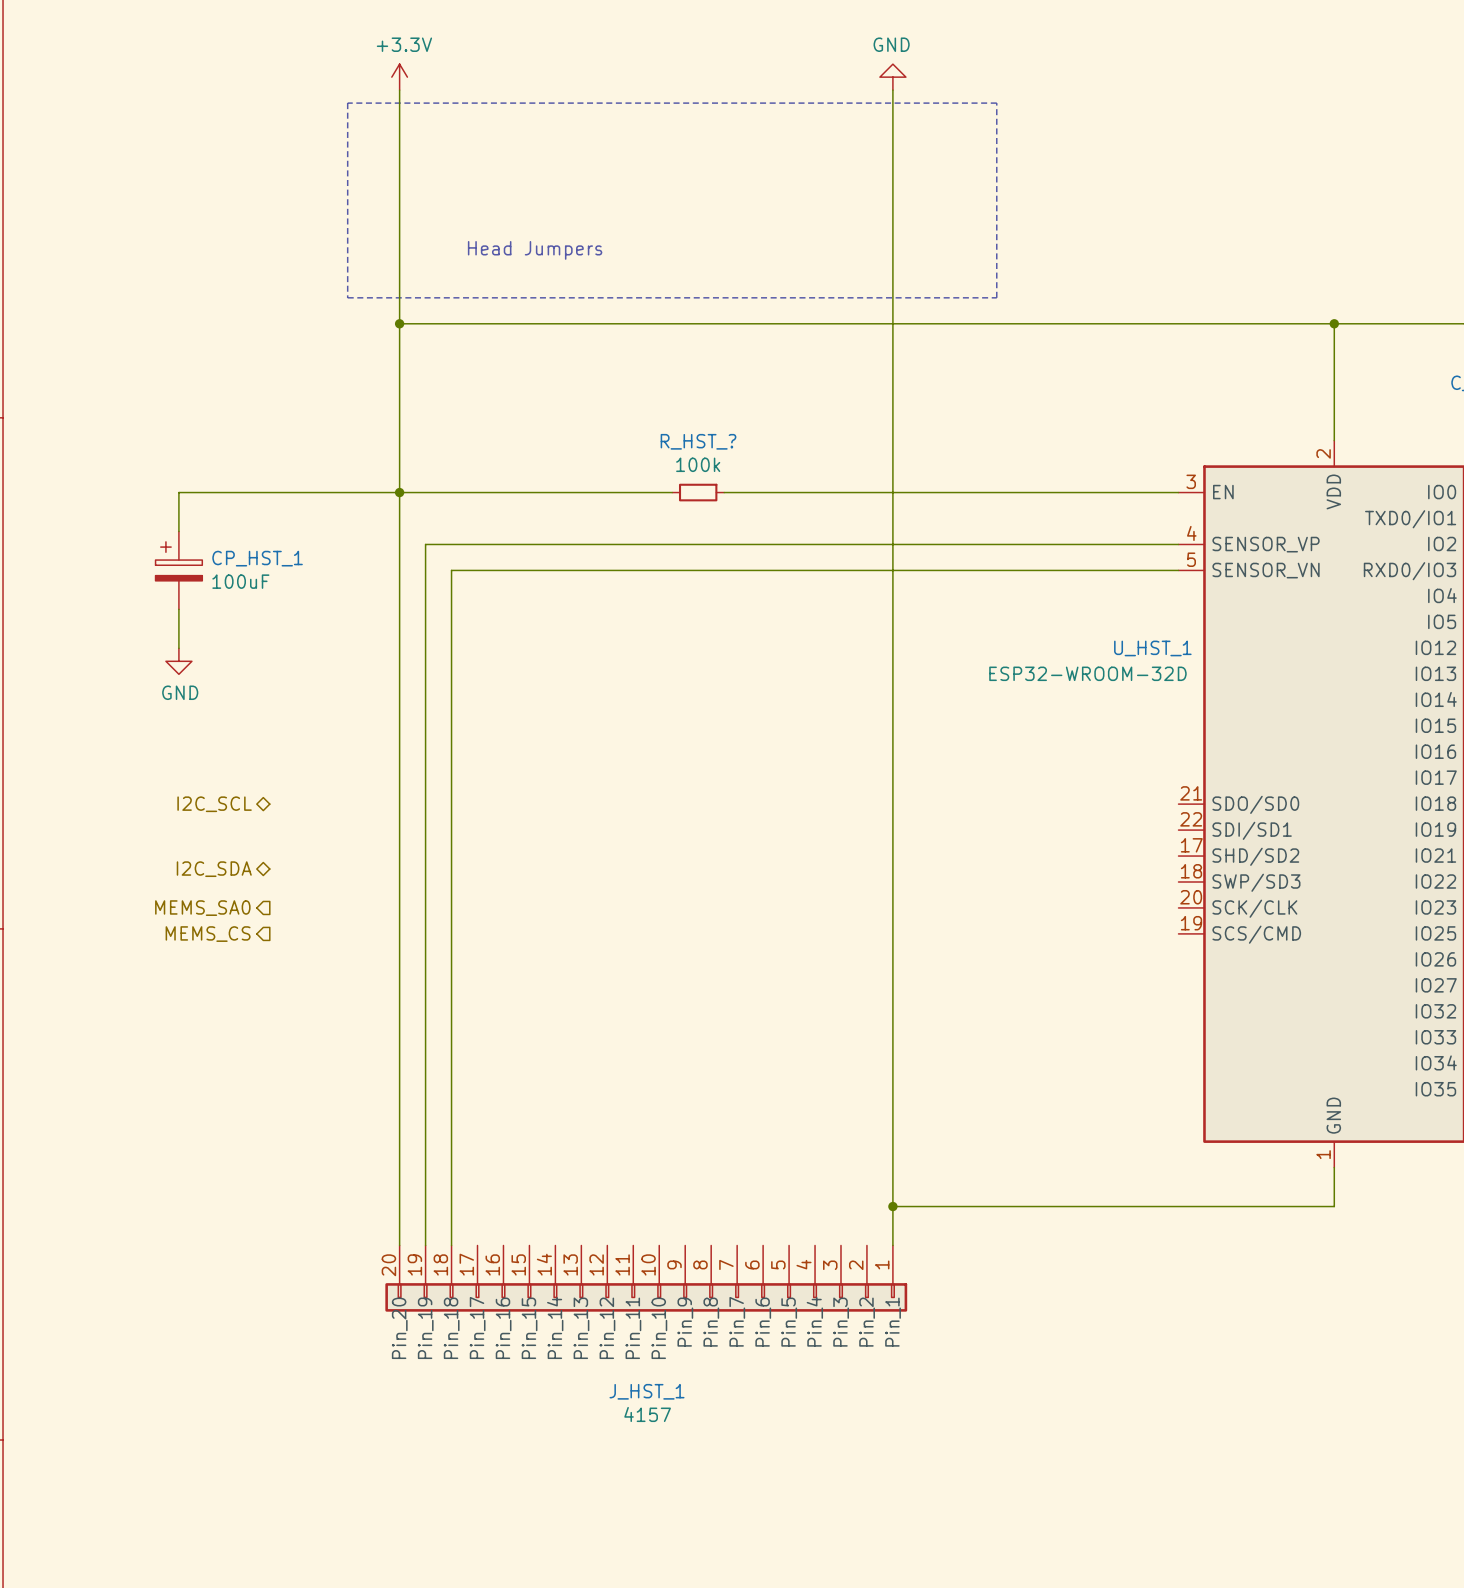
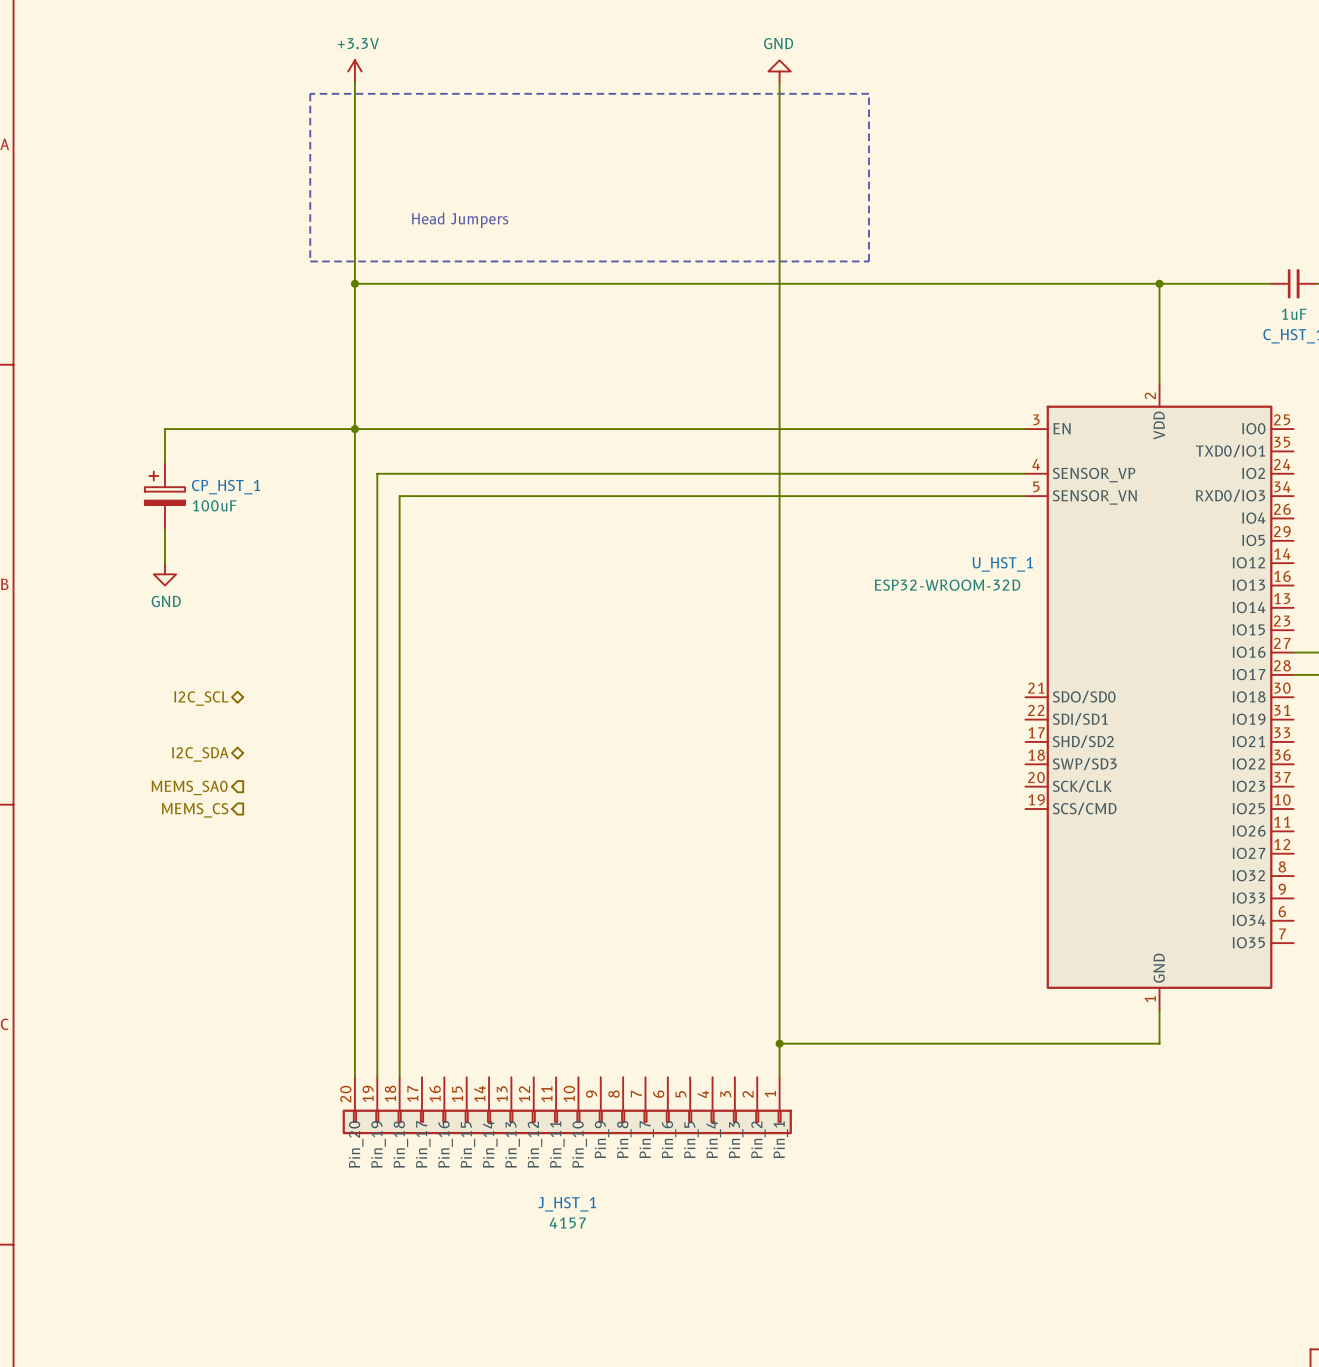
wire: none -> (589, 429) (634, 429)
R_HST_?: 100k (698, 492) -> none

